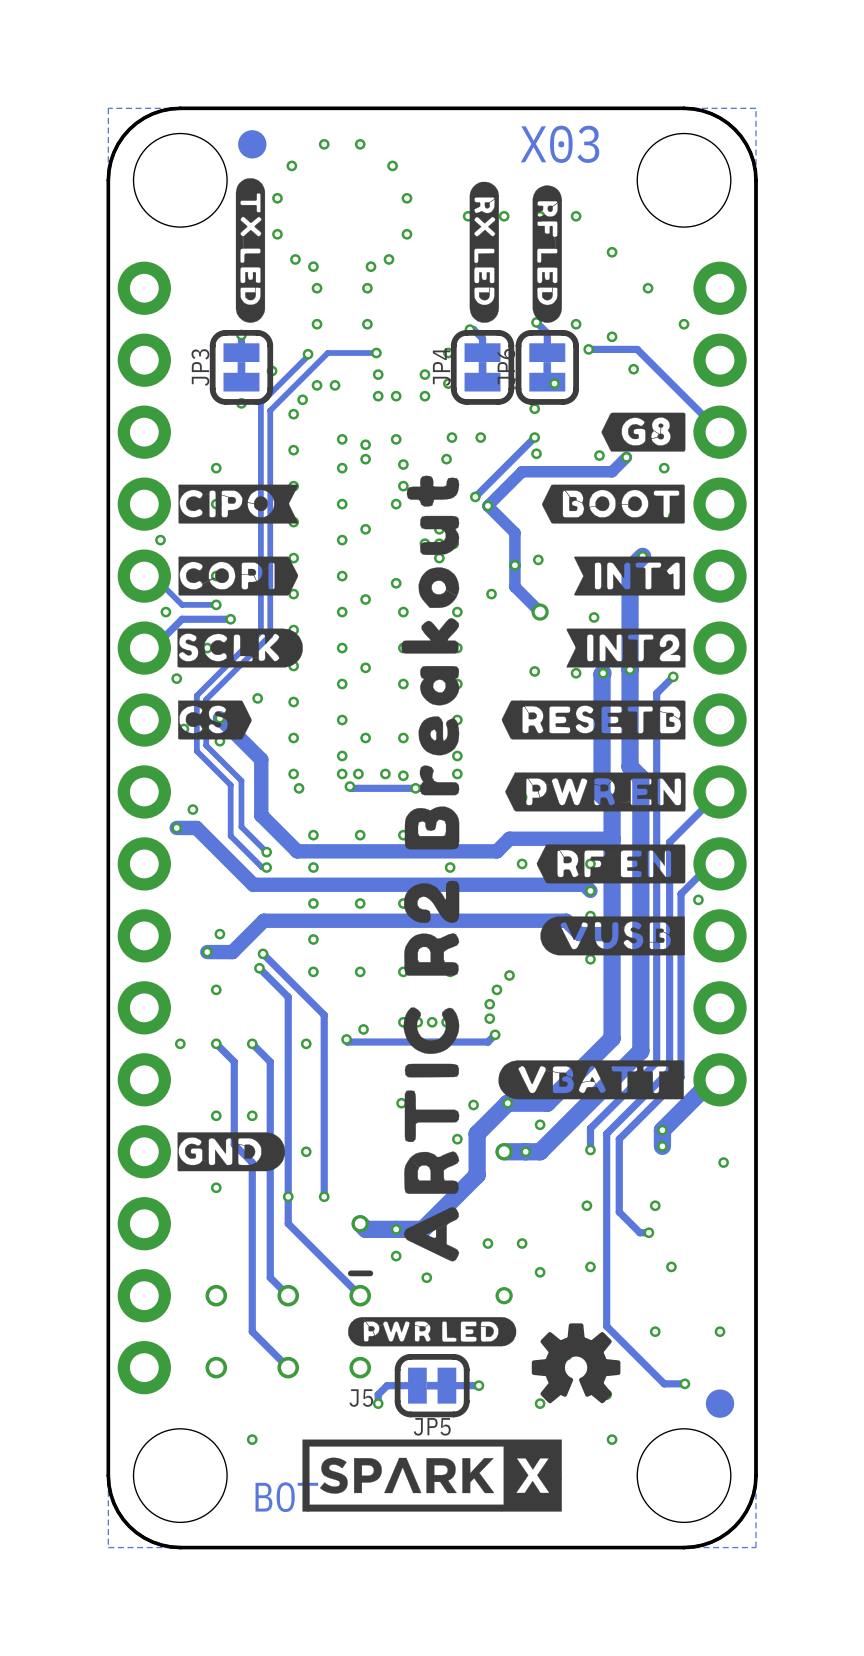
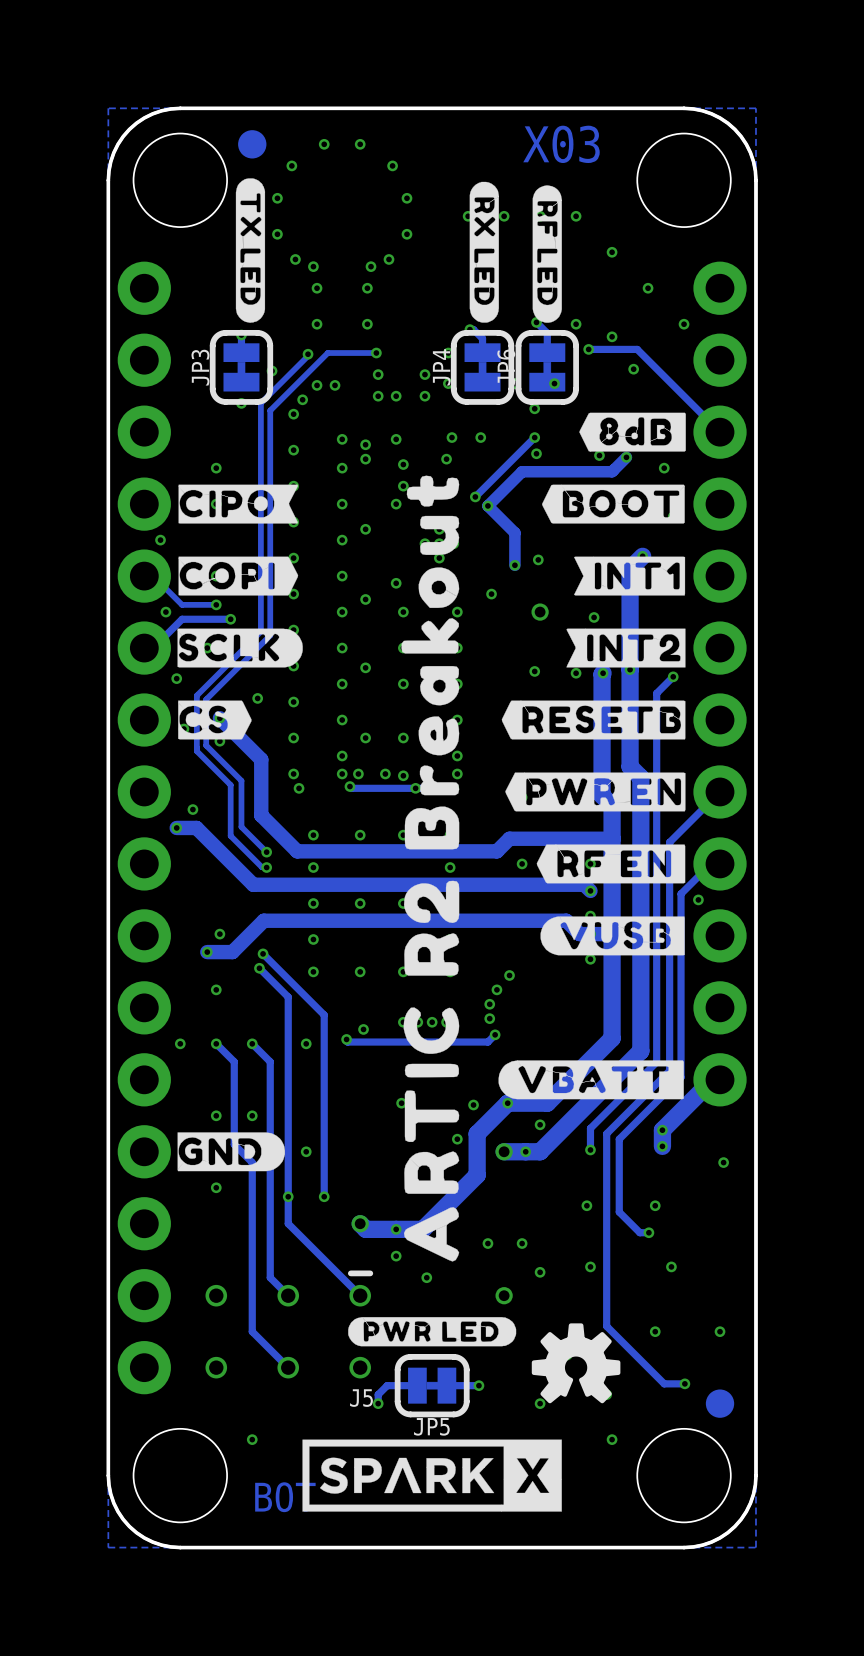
drawing shape: [601, 412, 686, 452] -> [579, 412, 686, 452]
track: (514, 565) (514, 586) (540, 612) -> none

